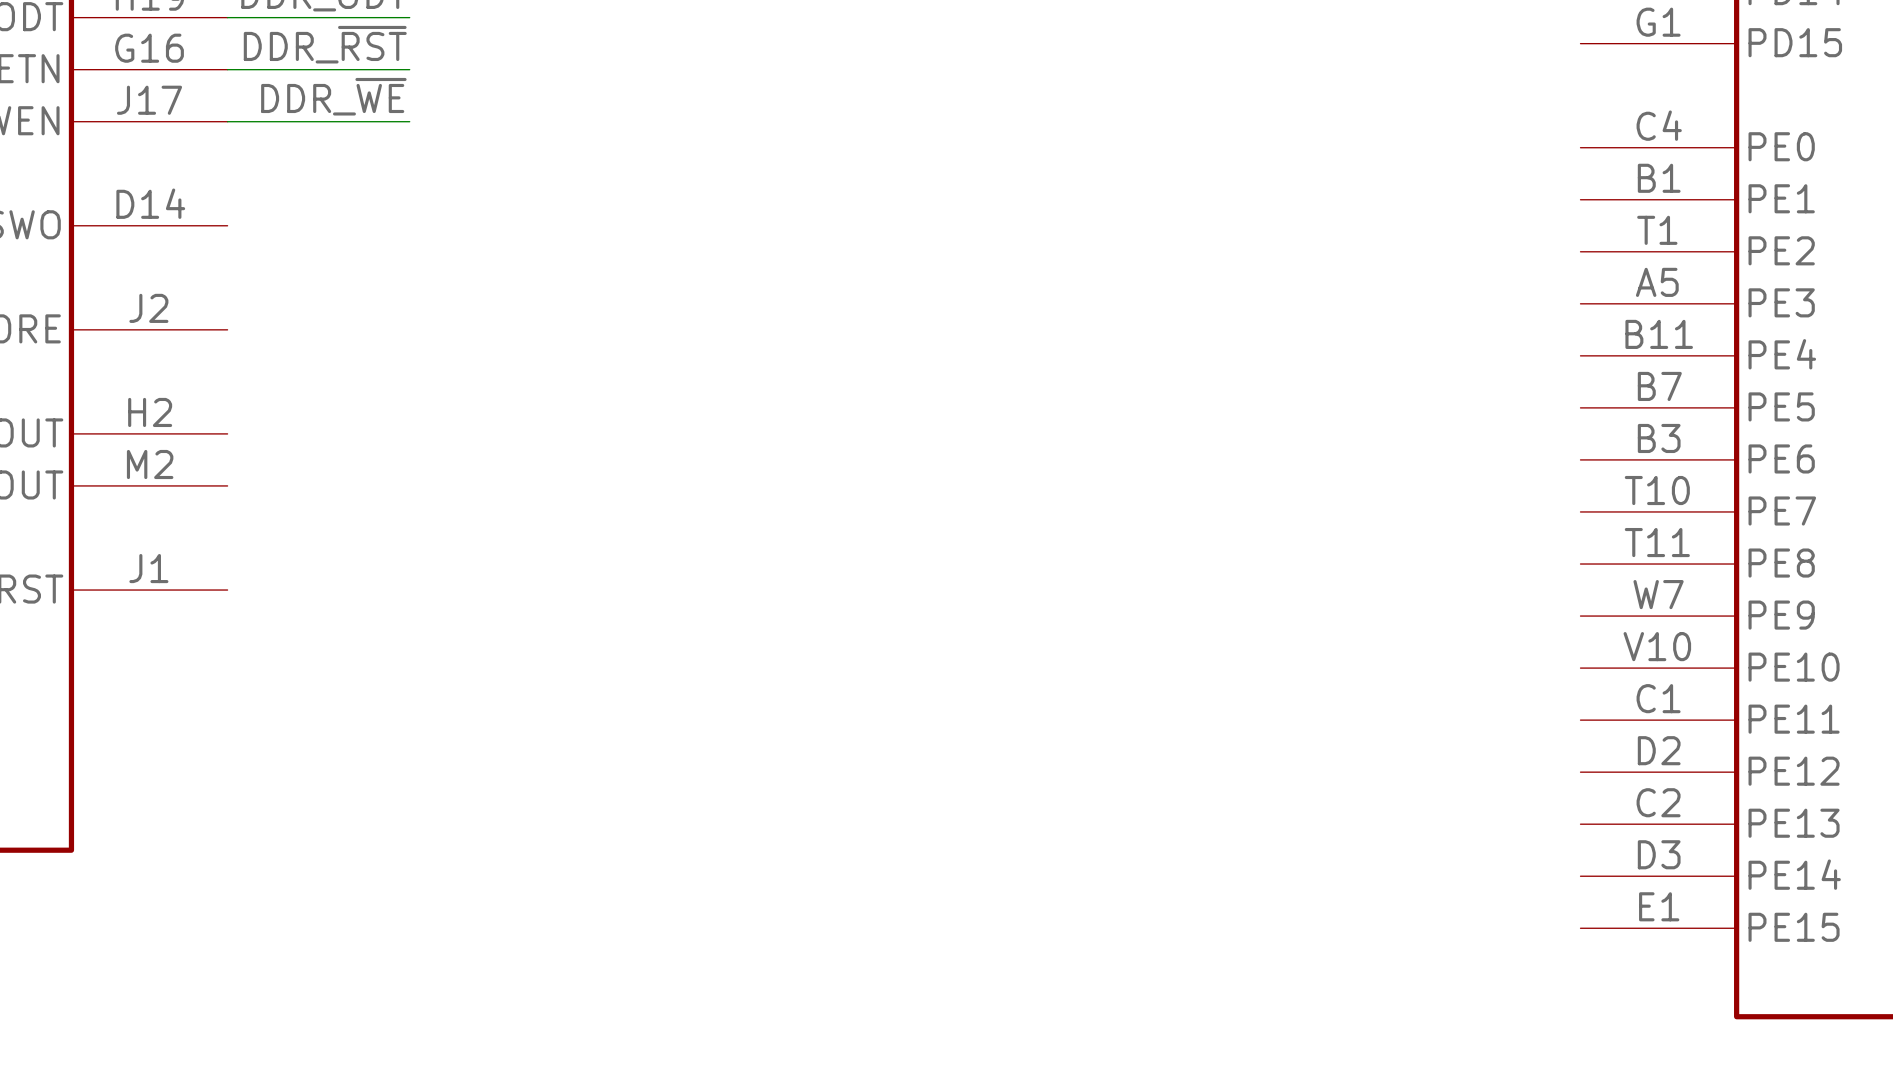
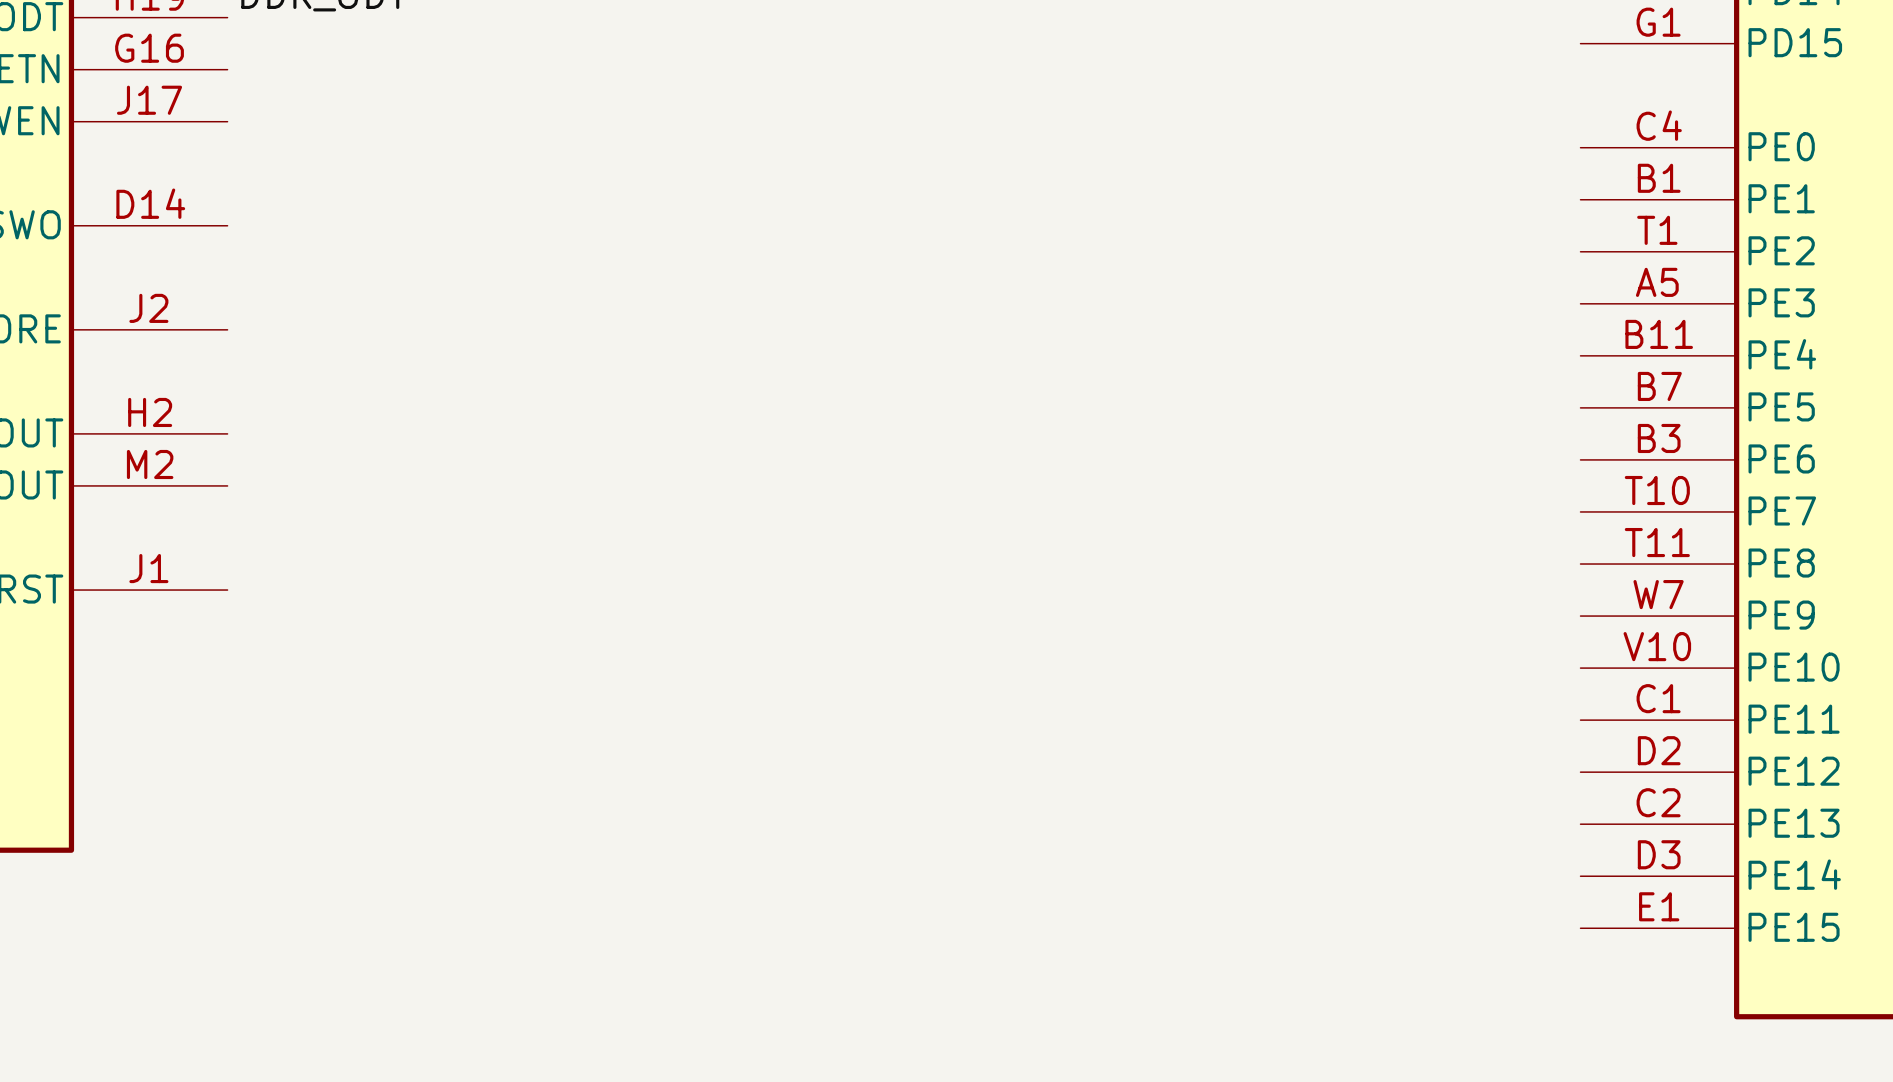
wire: (227, 17) (409, 17) -> none
label: DDR_~{RST} (325, 44) -> none
wire: (227, 69) (409, 69) -> none
label: DDR_~{WE} (333, 96) -> none
wire: (227, 121) (409, 121) -> none

